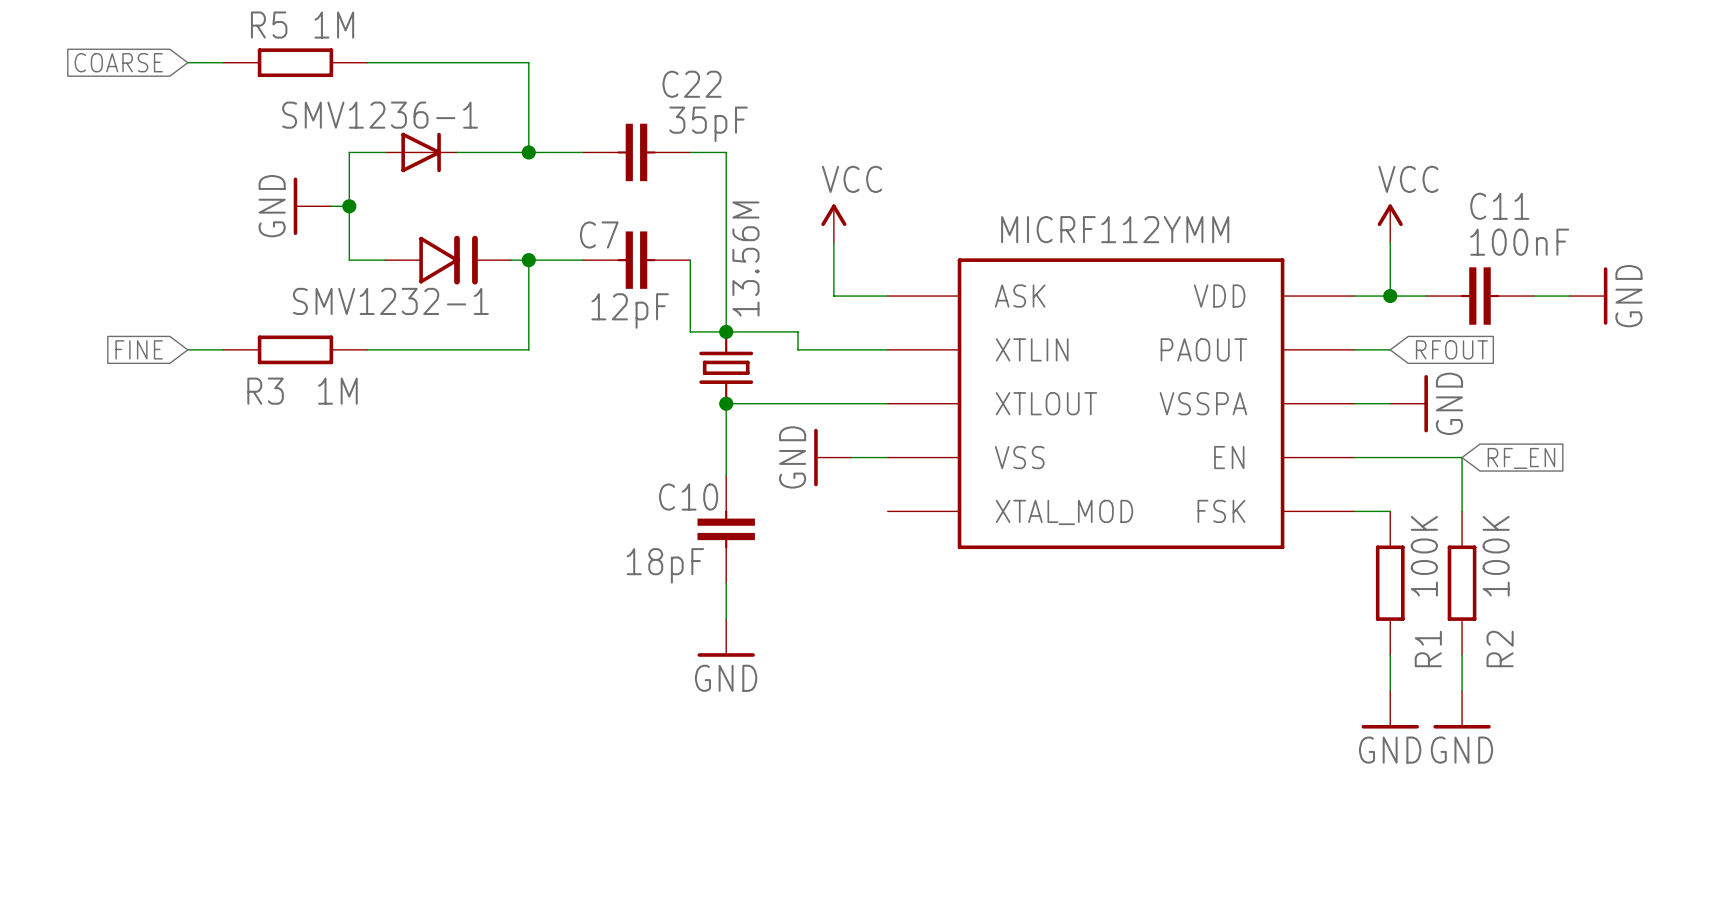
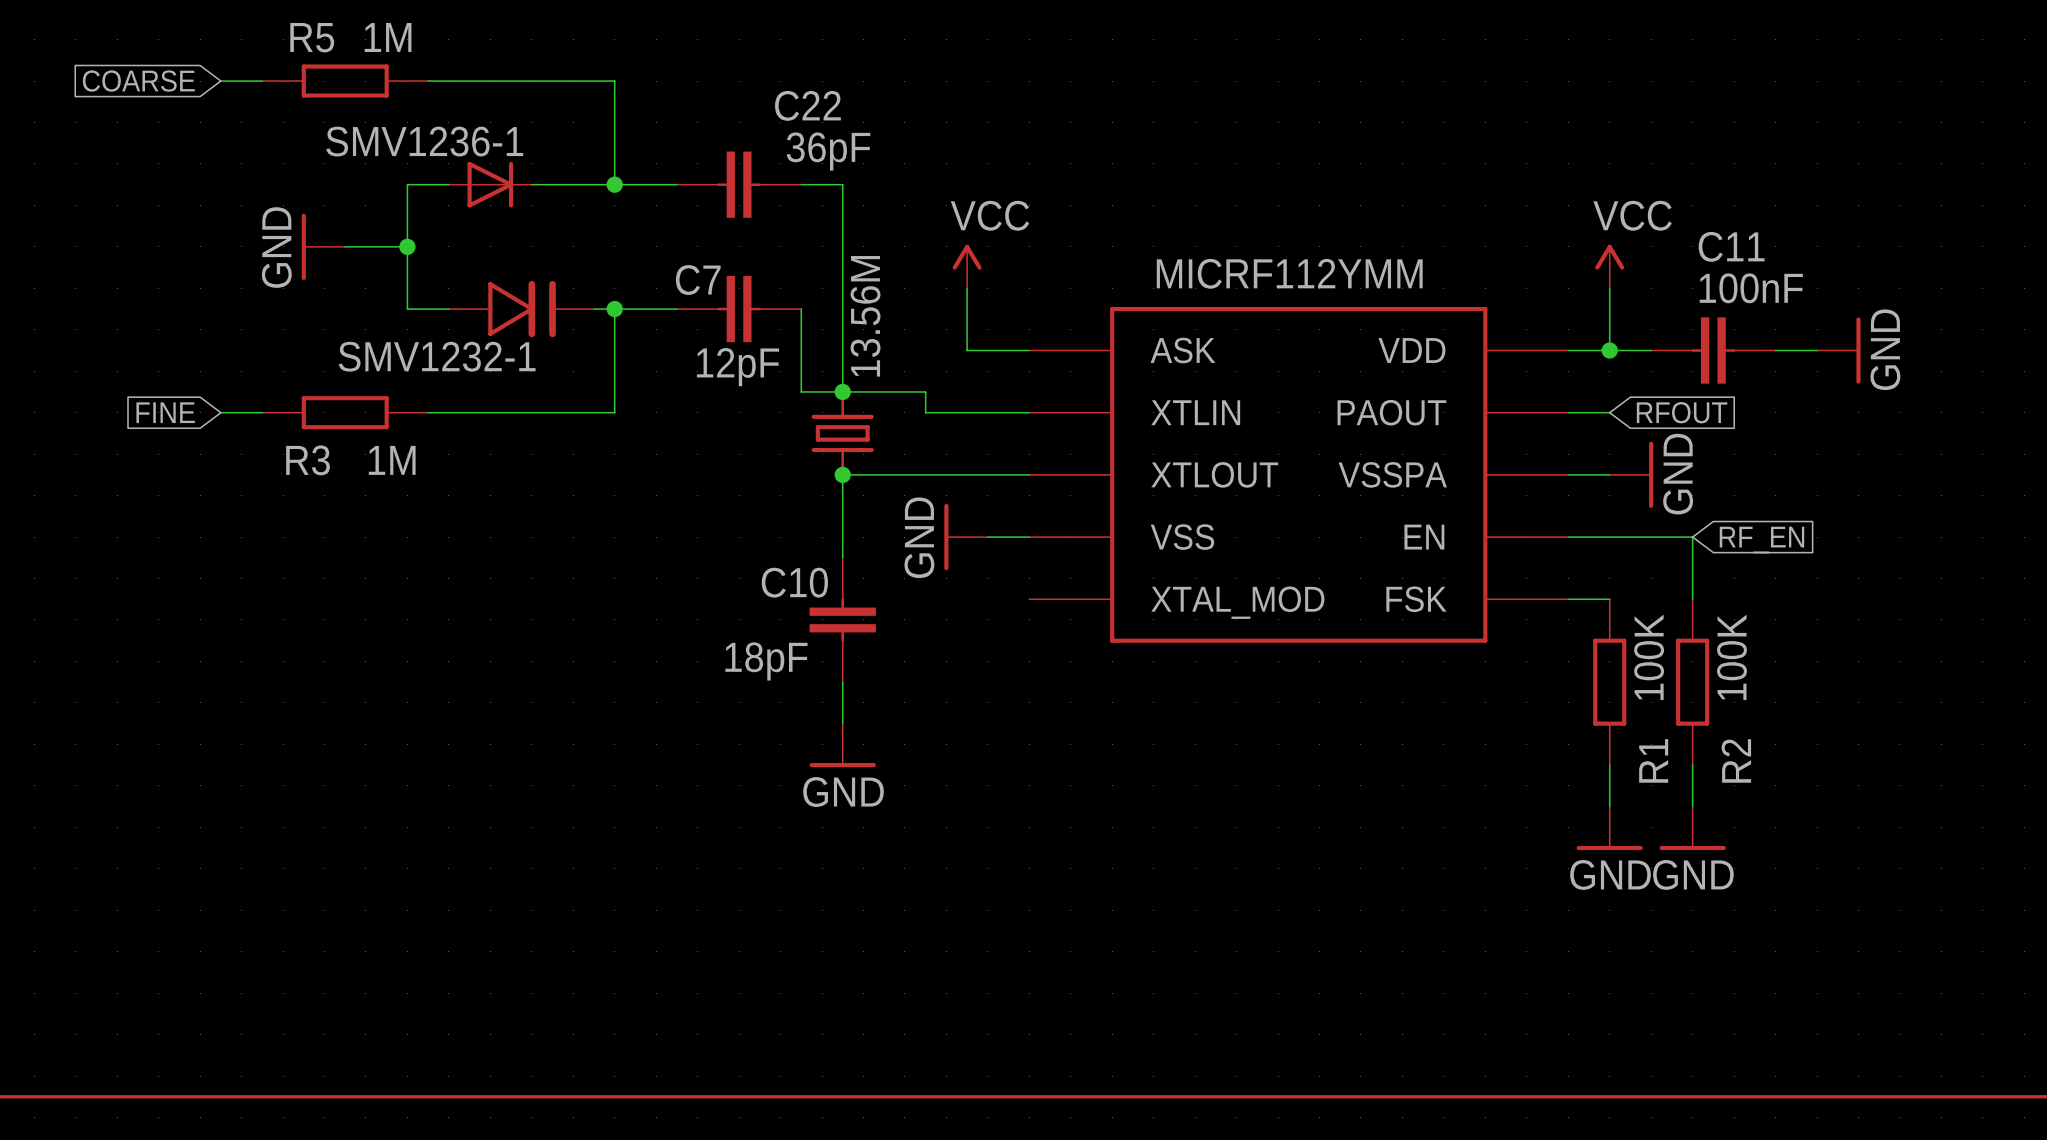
C22 value: 35pF (708, 124) -> 36pF (828, 151)
power symbol position: GND (312, 206) -> GND (323, 246)

